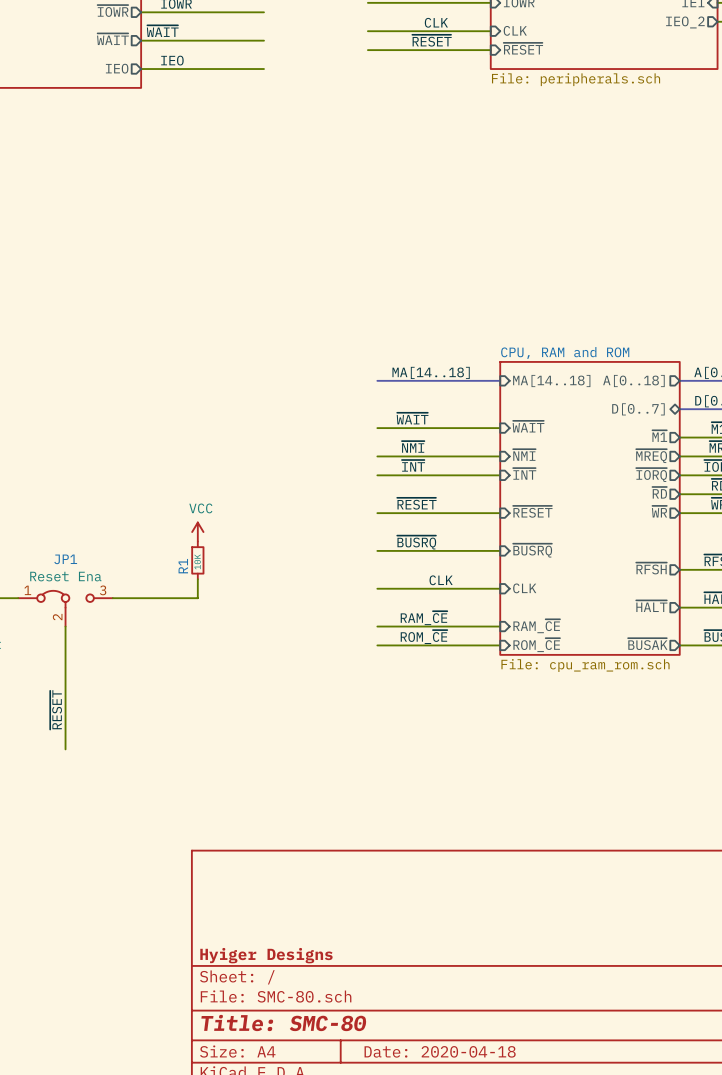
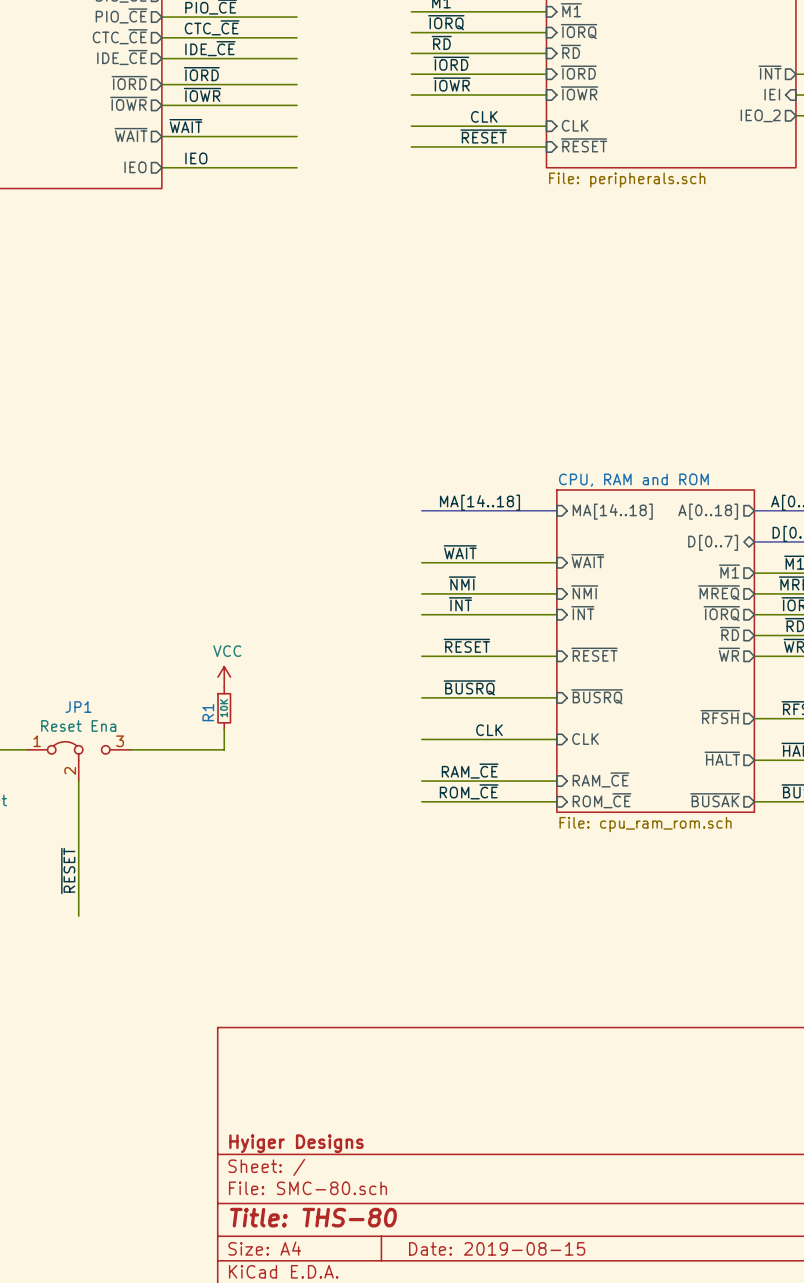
title block: Title: SMC-80 (283, 1023) -> Title: THS-80 (313, 1217)
title block: Date: 2020-04-18 (440, 1051) -> Date: 2019-08-15 (497, 1248)

